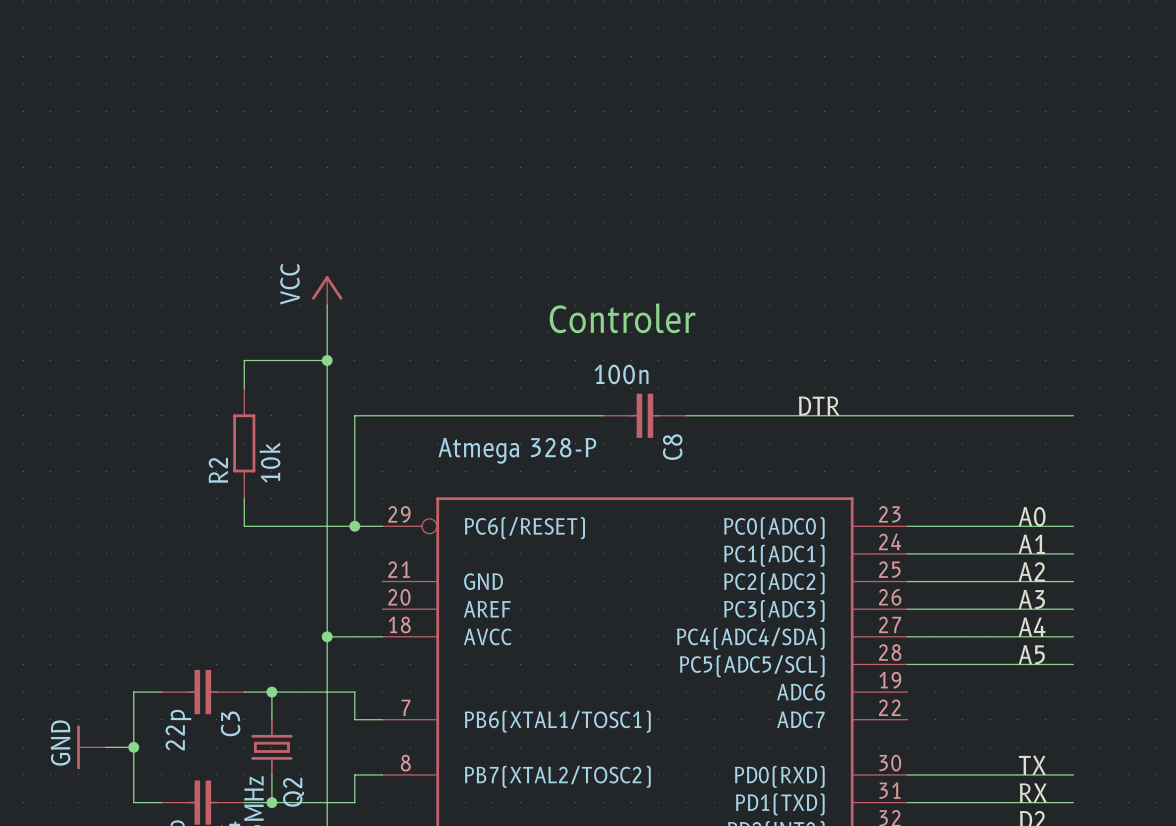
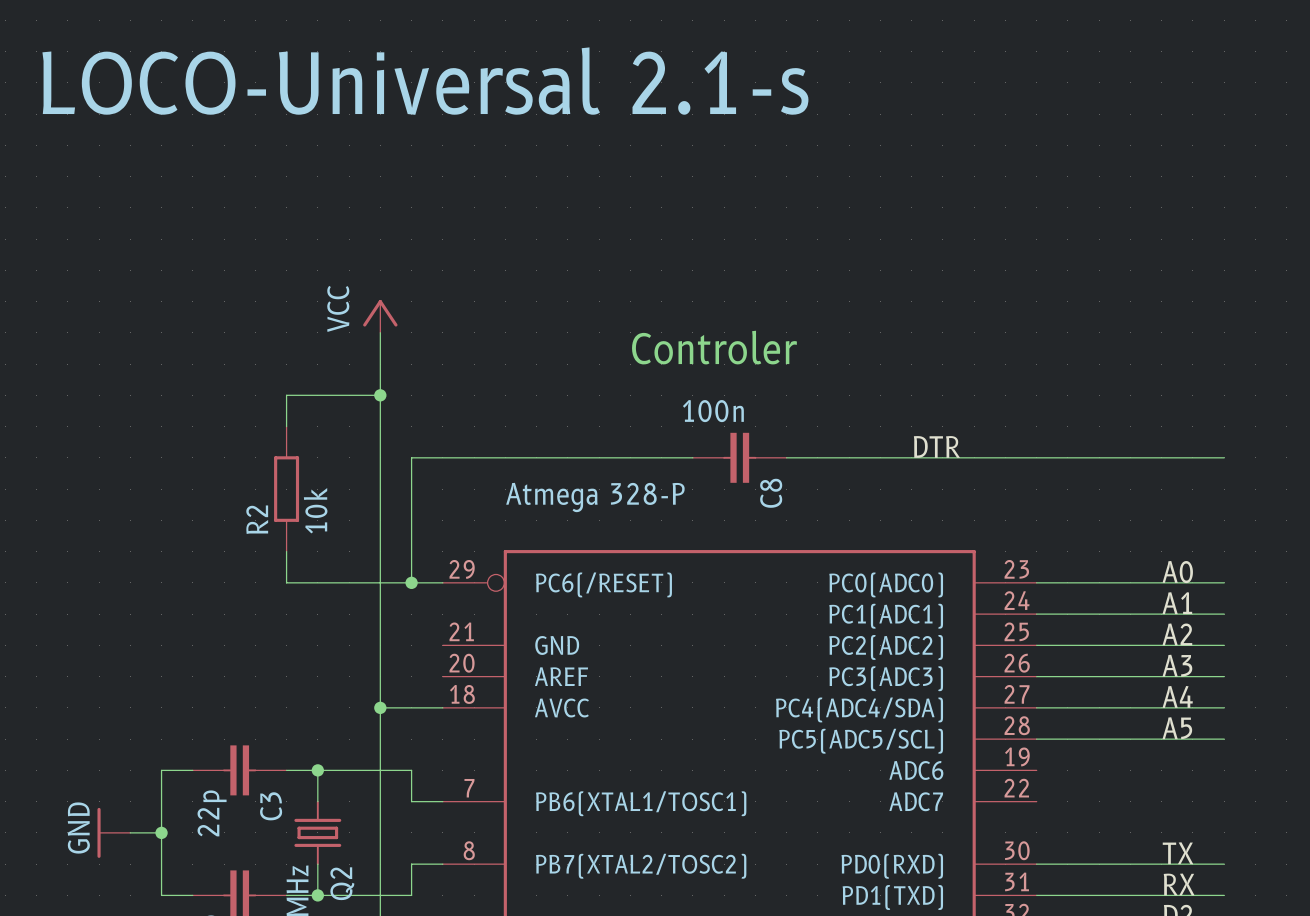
text: none -> LOCO-Universal 2.1-s (425, 81)

